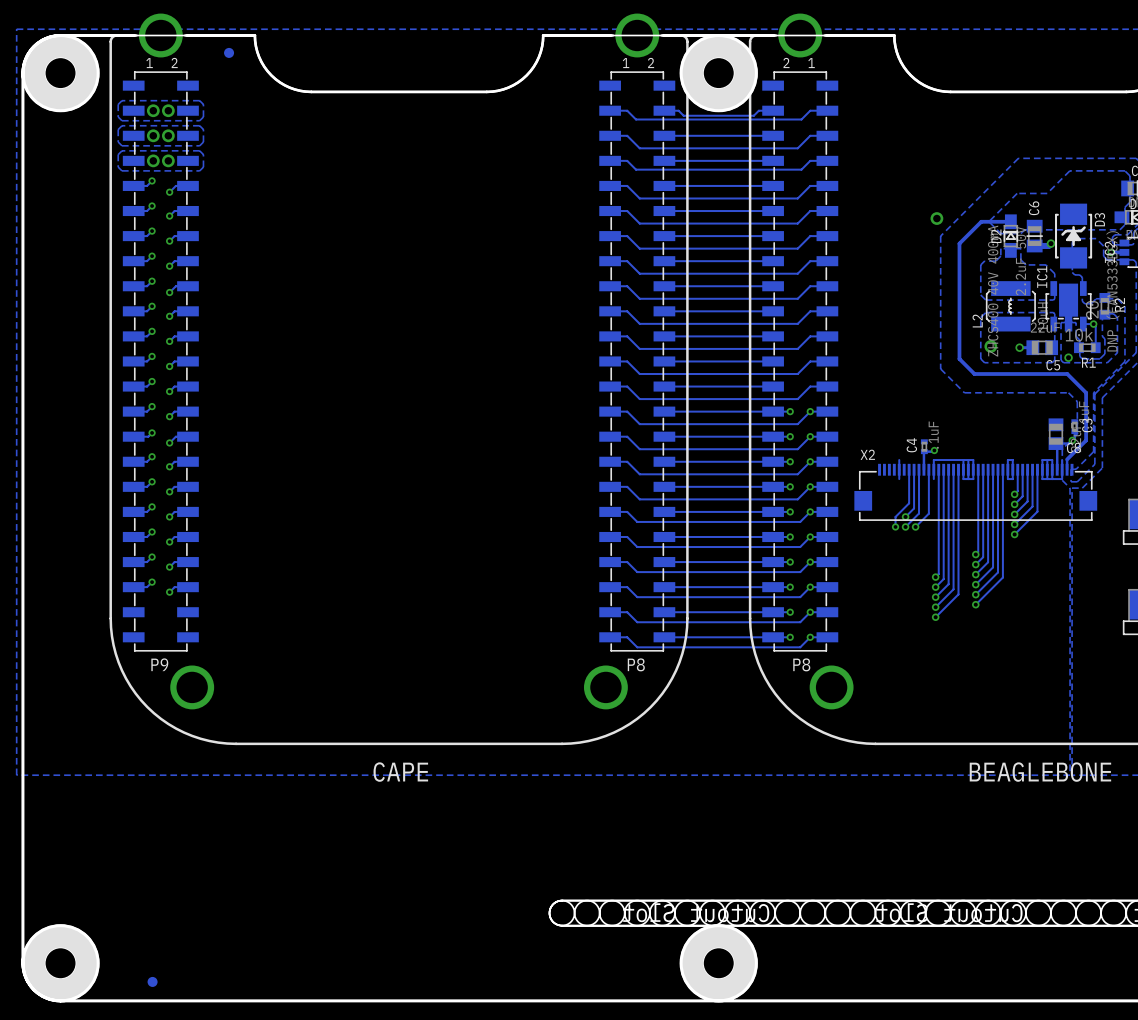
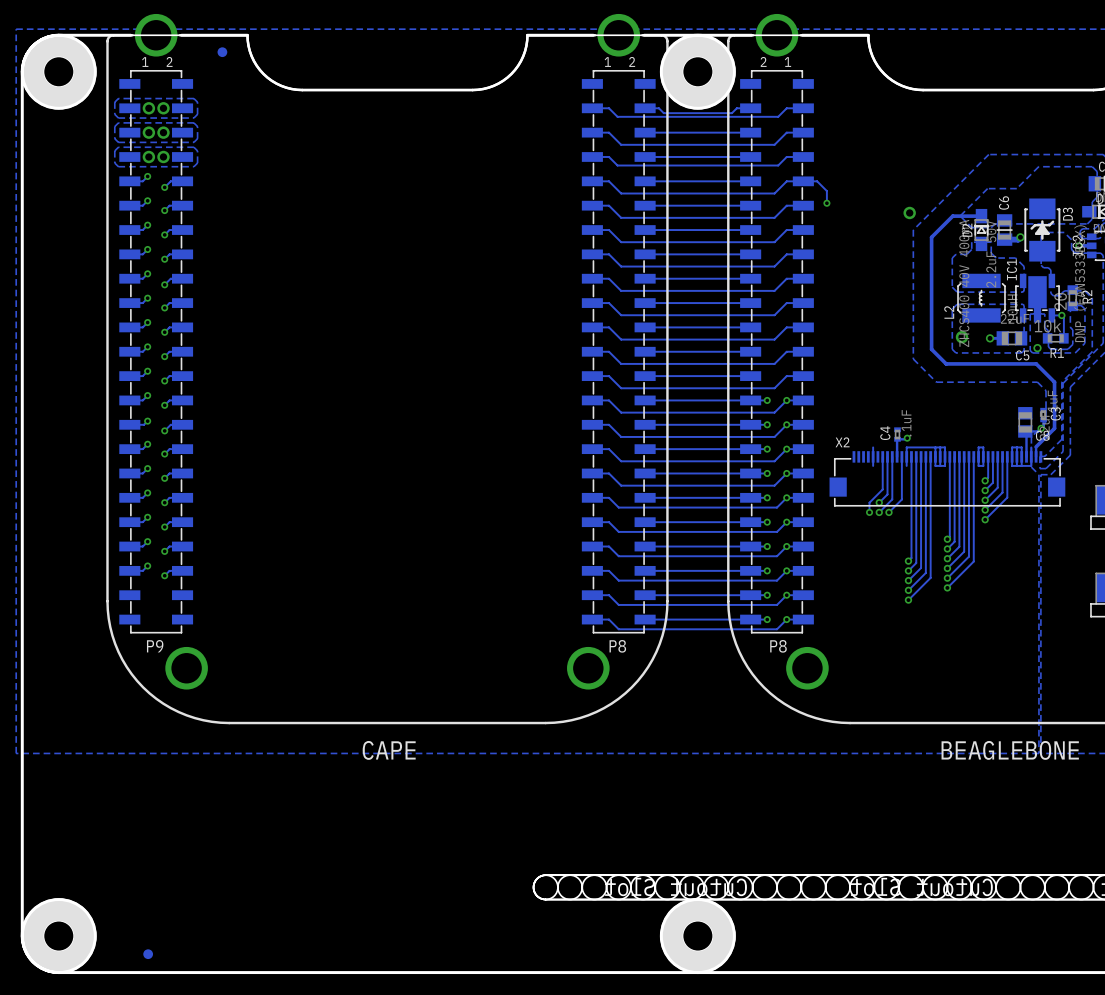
track: none -> (803, 181) (817, 181) (826, 191) (826, 203)
via: none -> (826, 203)

